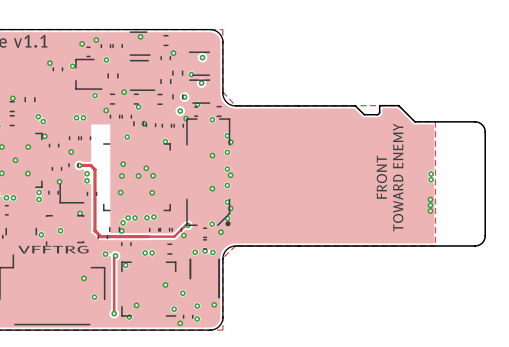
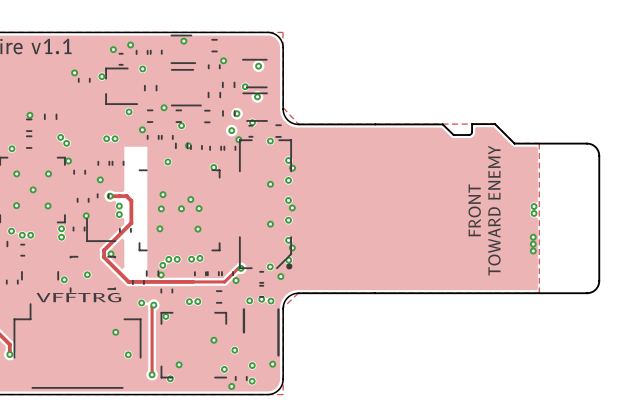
track: (90, 165) (94, 169) (94, 230) (100, 236) -> (123, 196) (131, 200) (131, 223) (104, 250) (104, 257) (128, 281) (135, 281)

